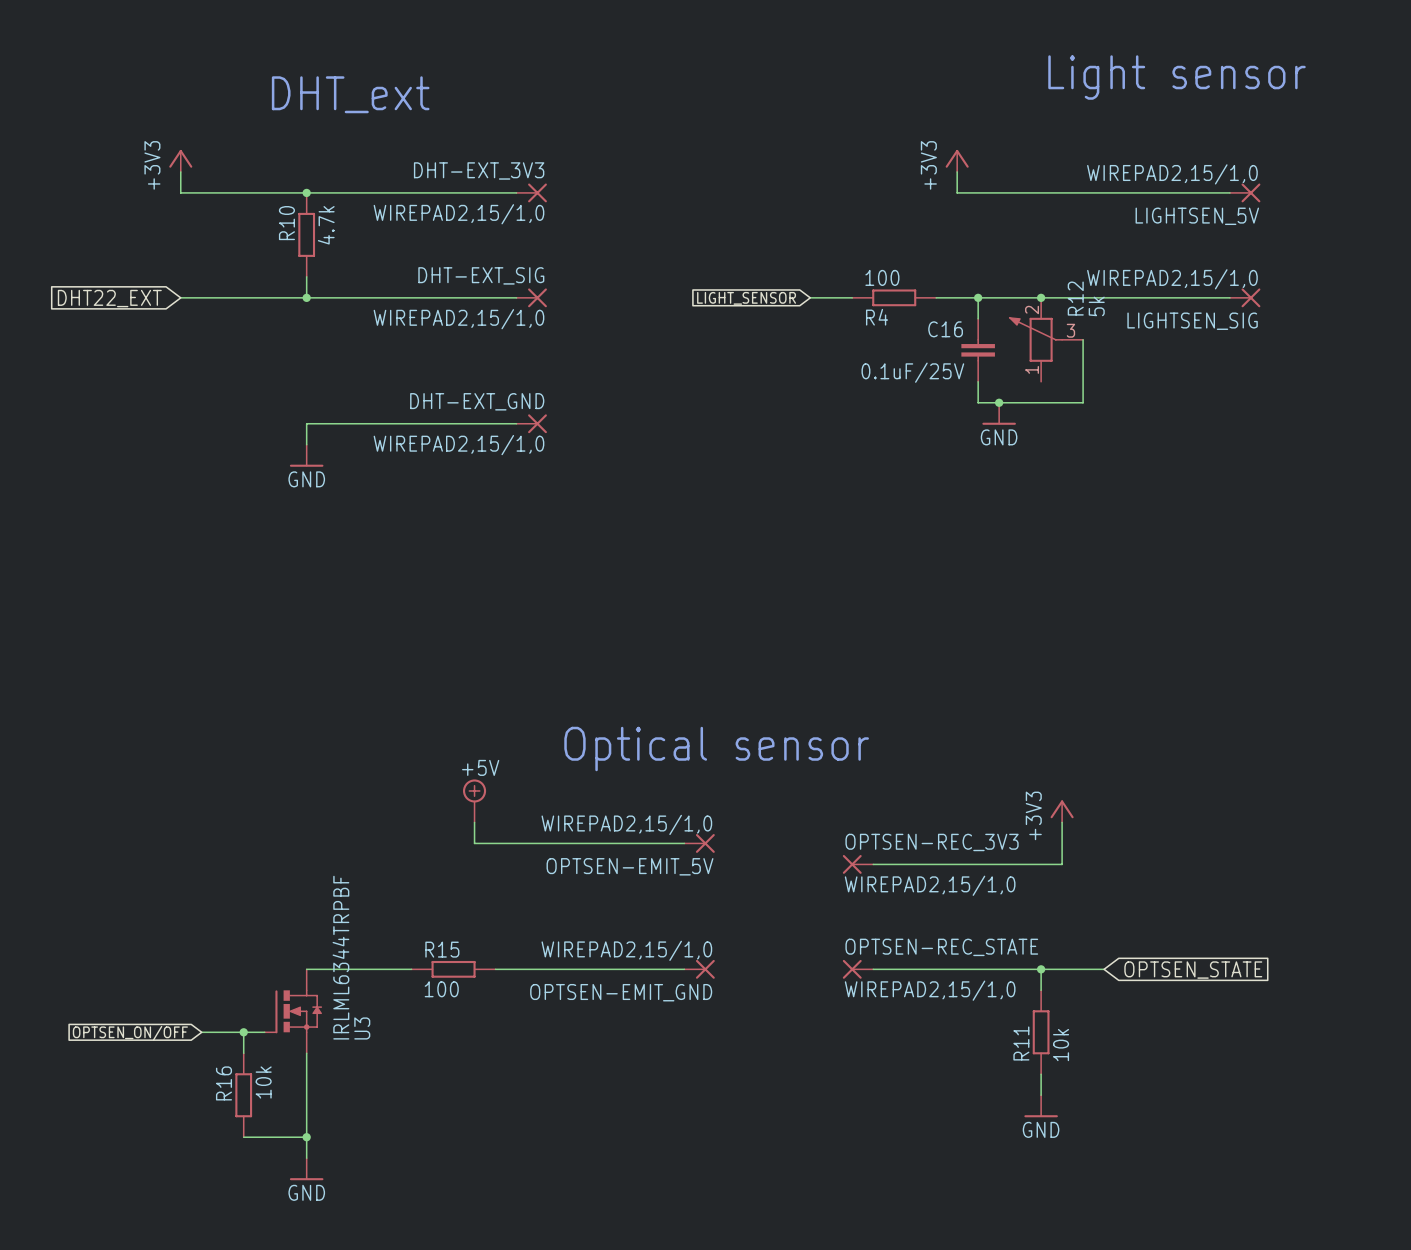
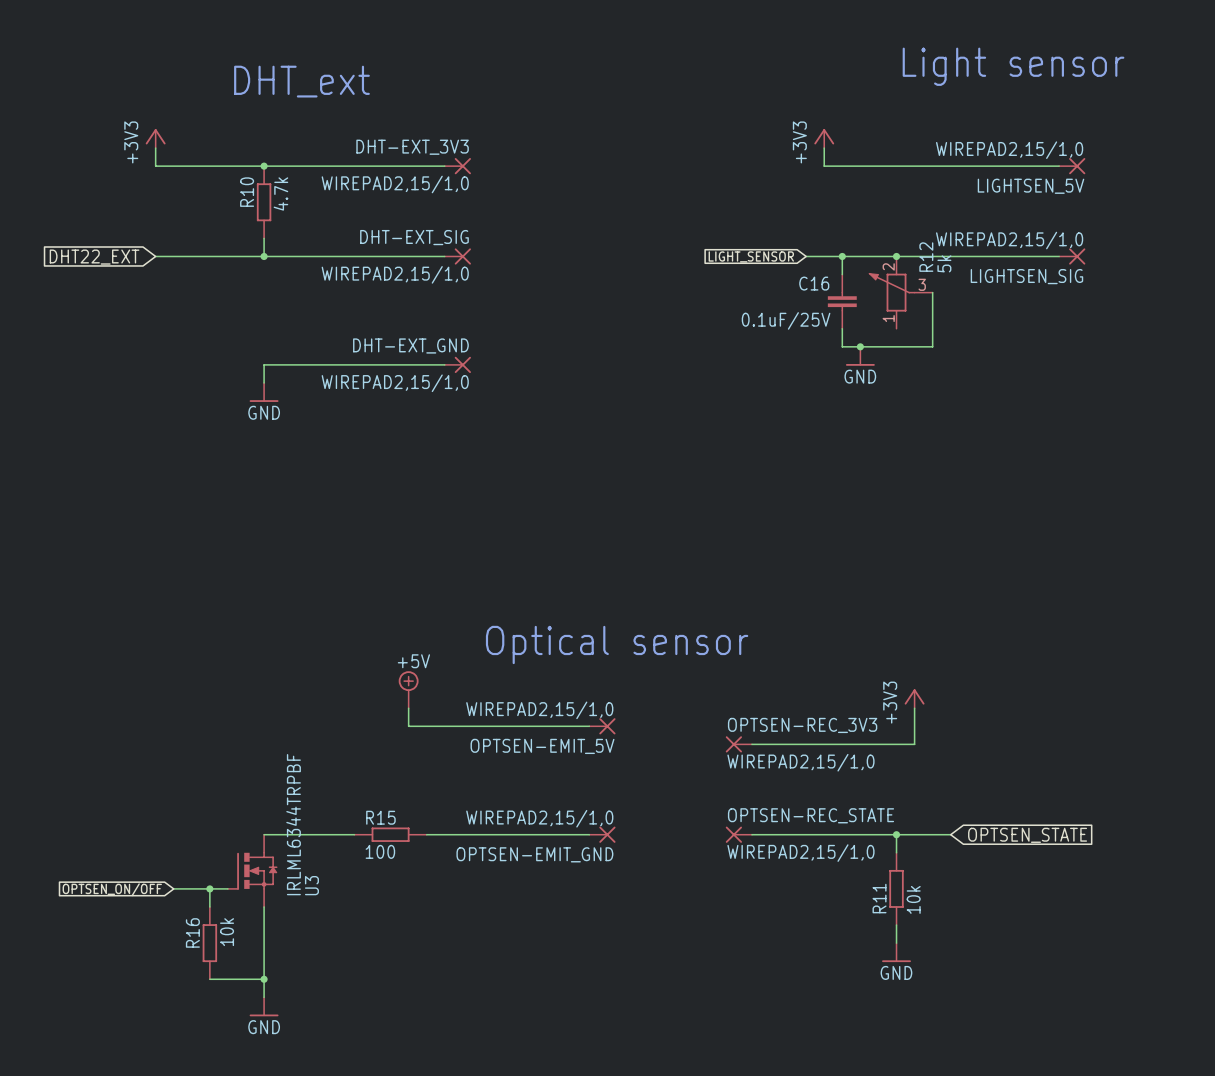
wire: (810, 297) (852, 297) -> none
R4: 100 (894, 297) -> none
global label position: LIGHT_SENSOR (746, 298) -> LIGHT_SENSOR (751, 256)

